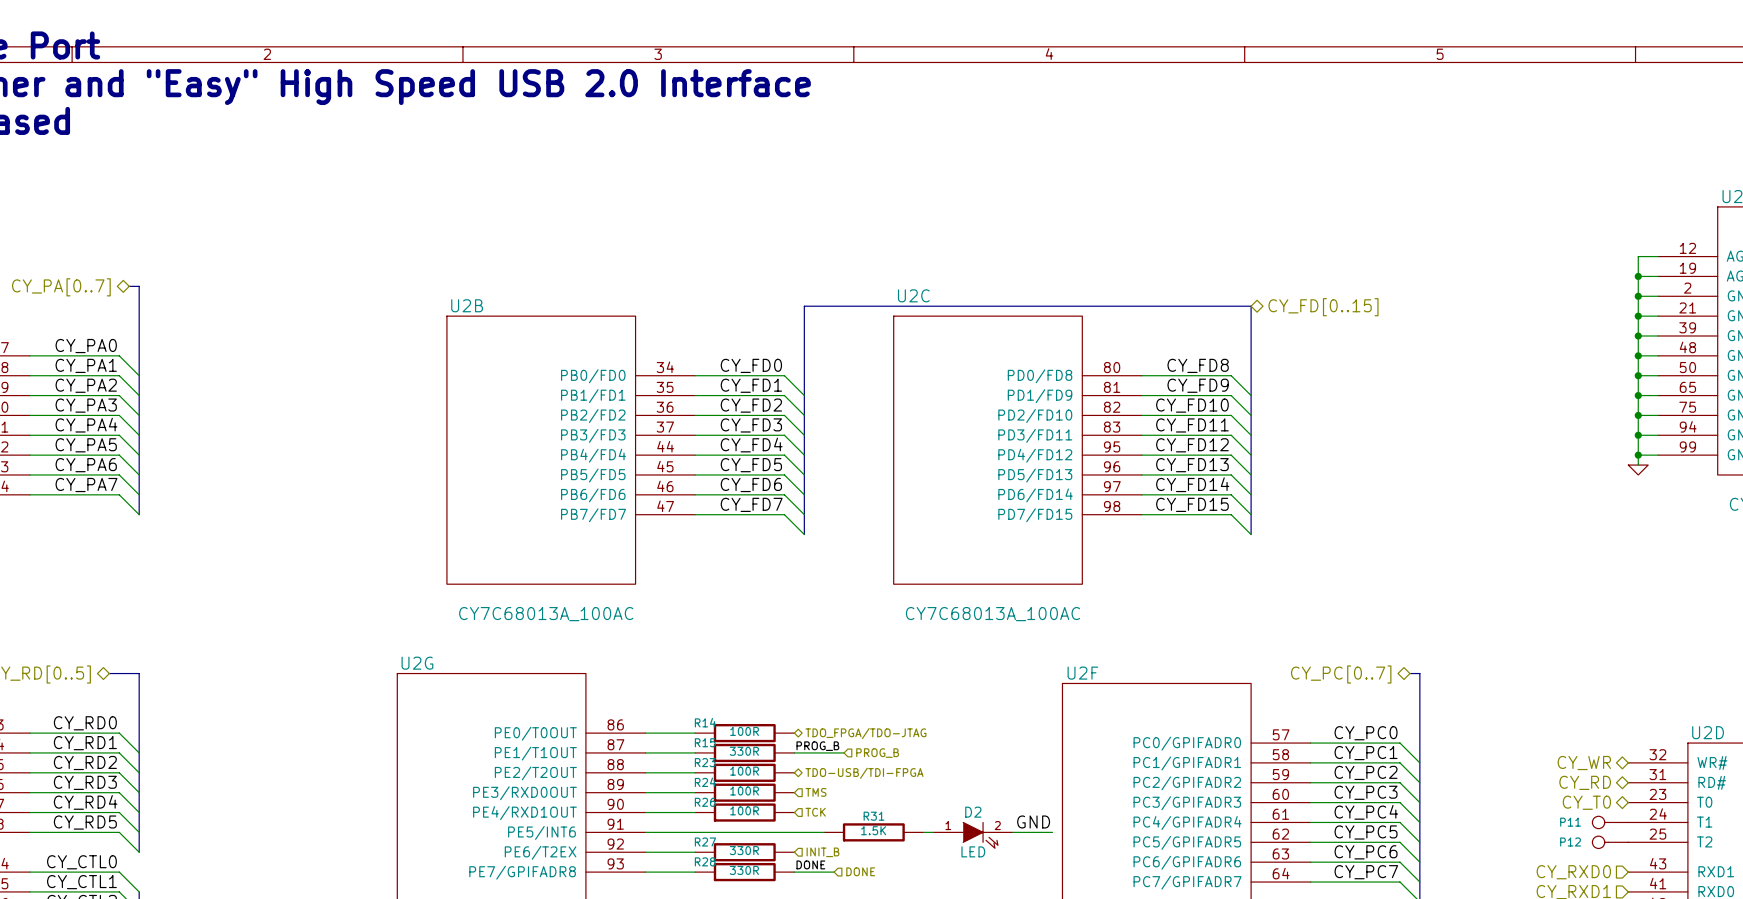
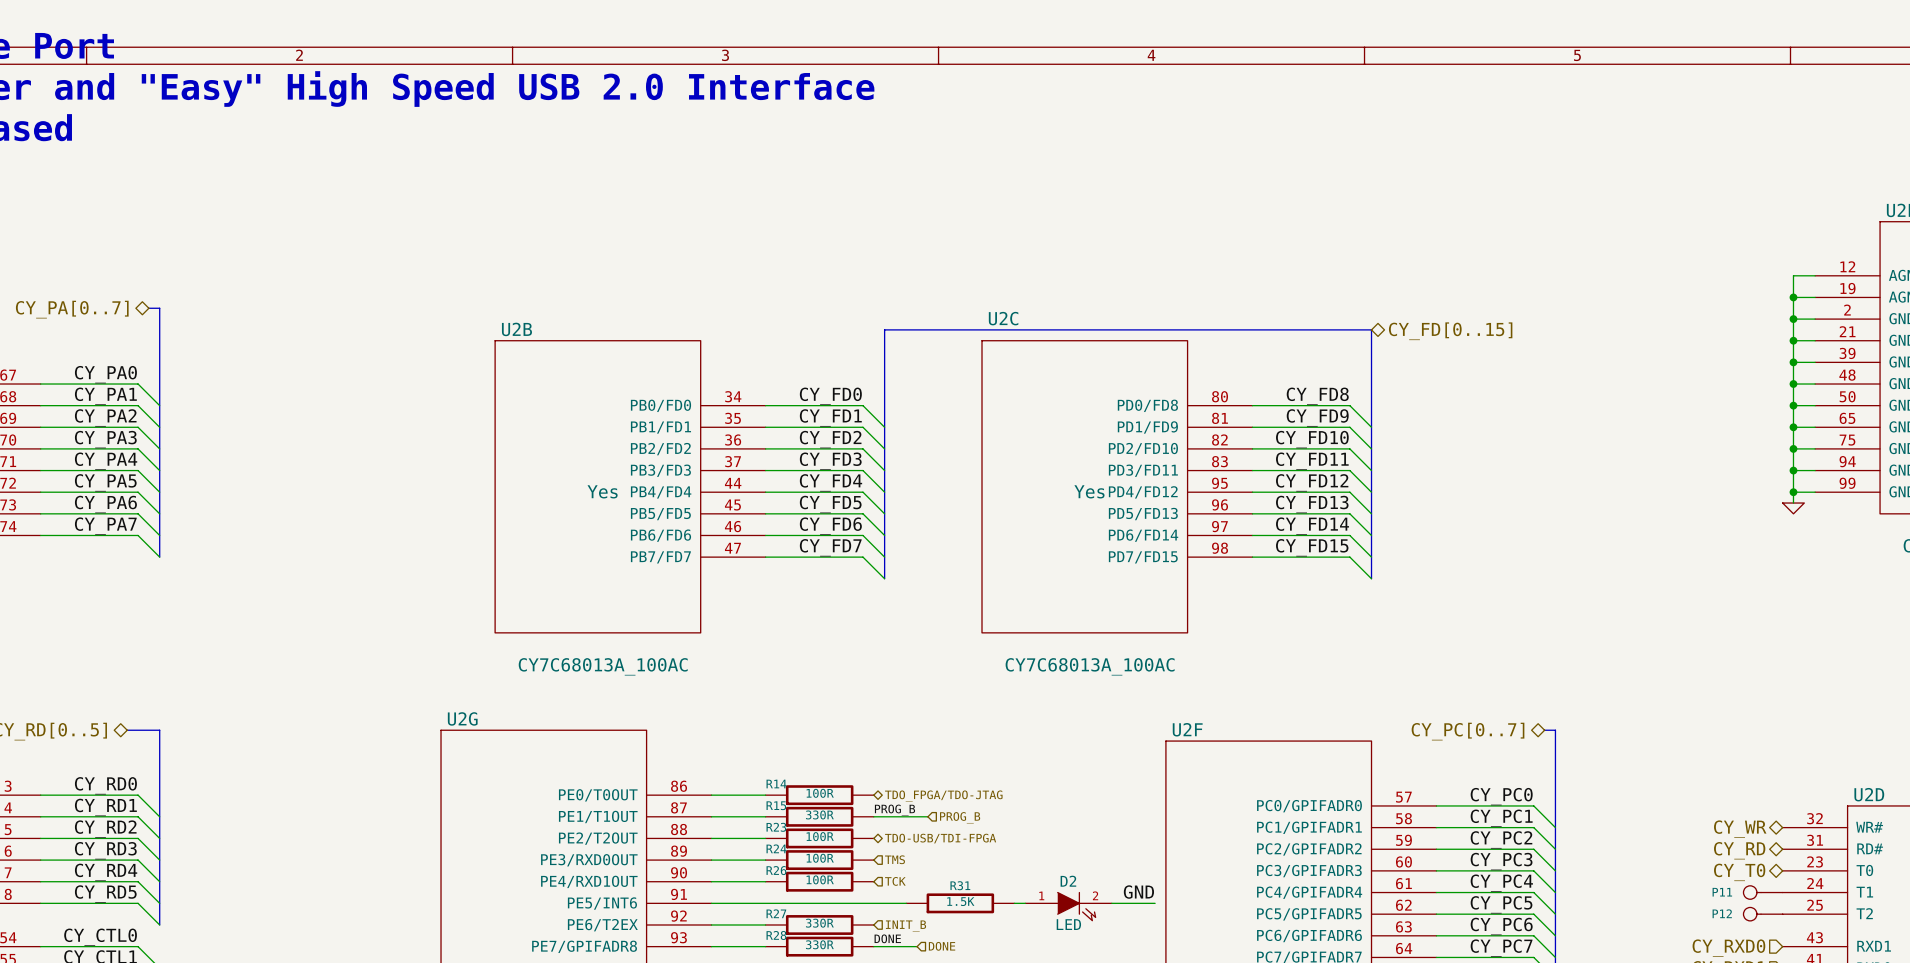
U2B text: none -> Yes (602, 491)
U2C text: none -> Yes (1089, 491)

